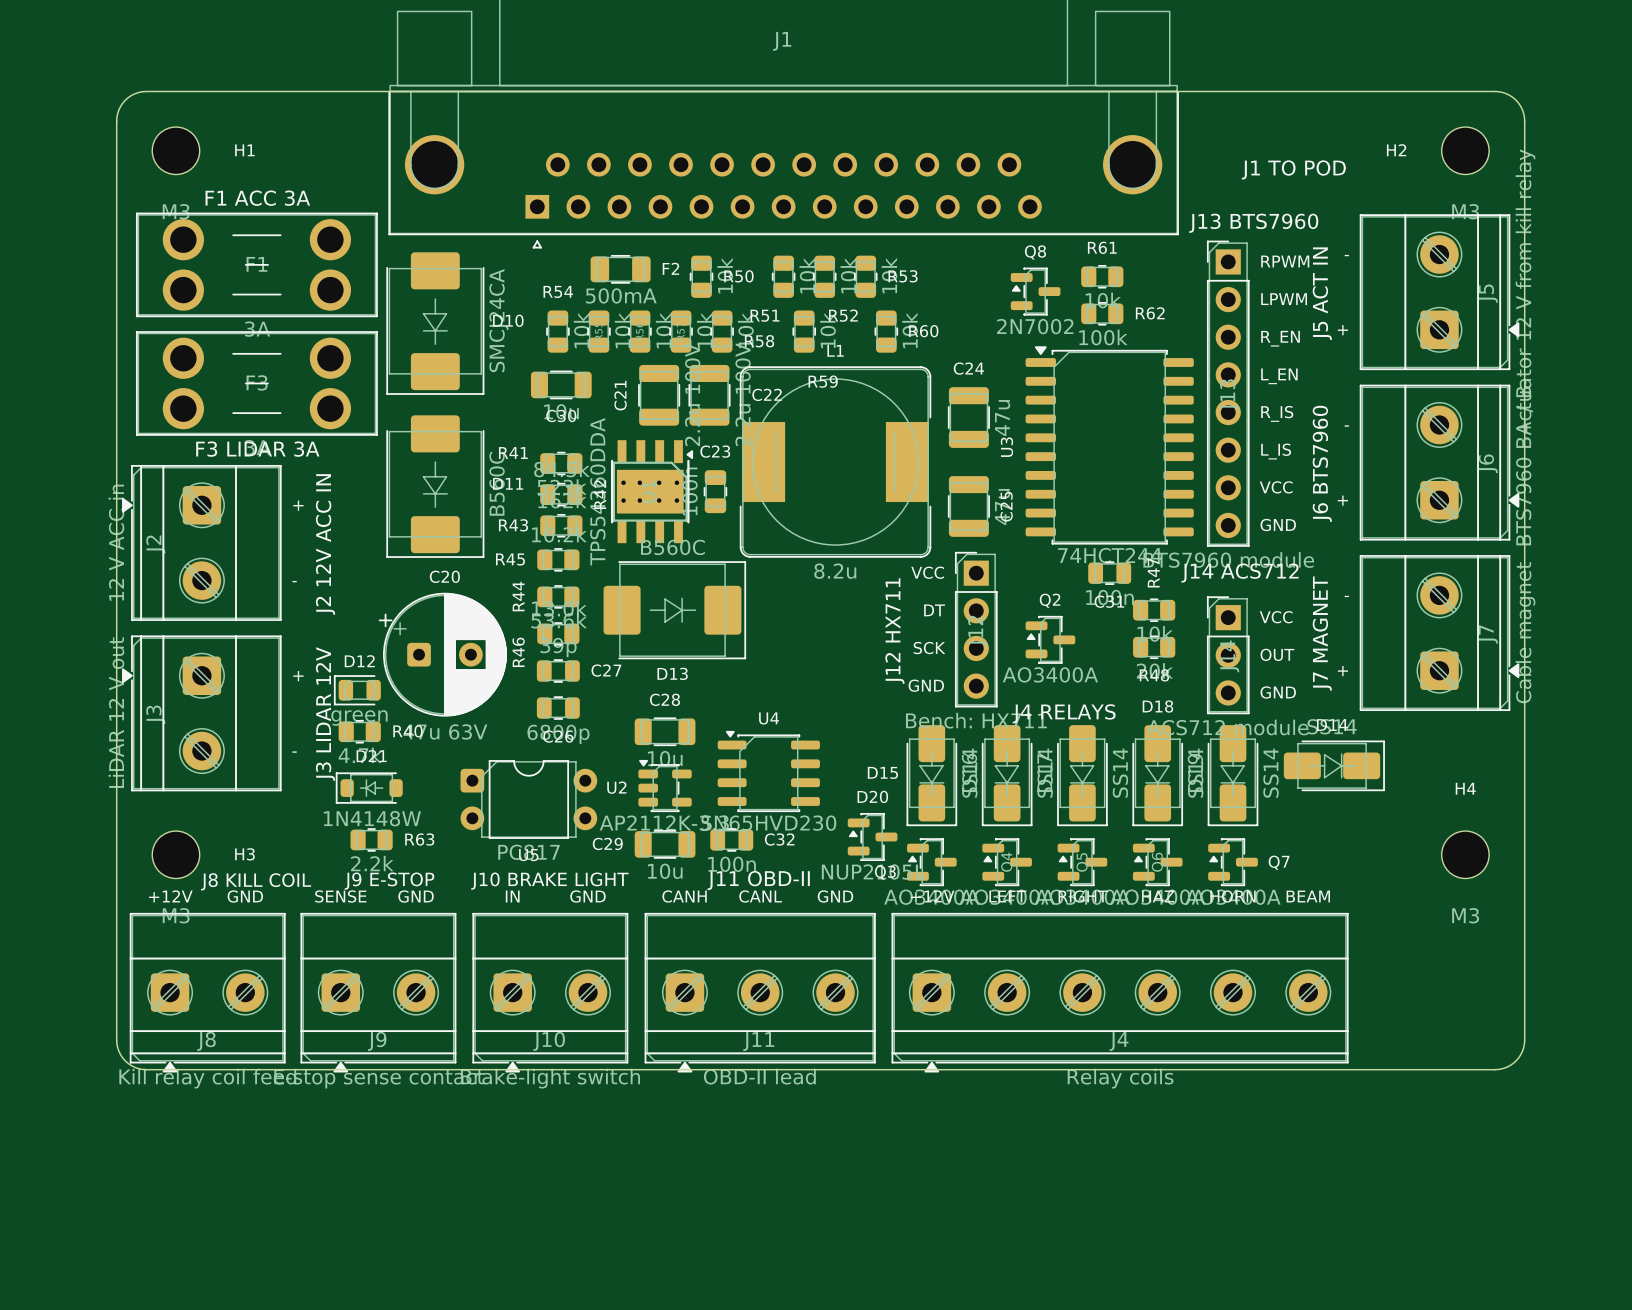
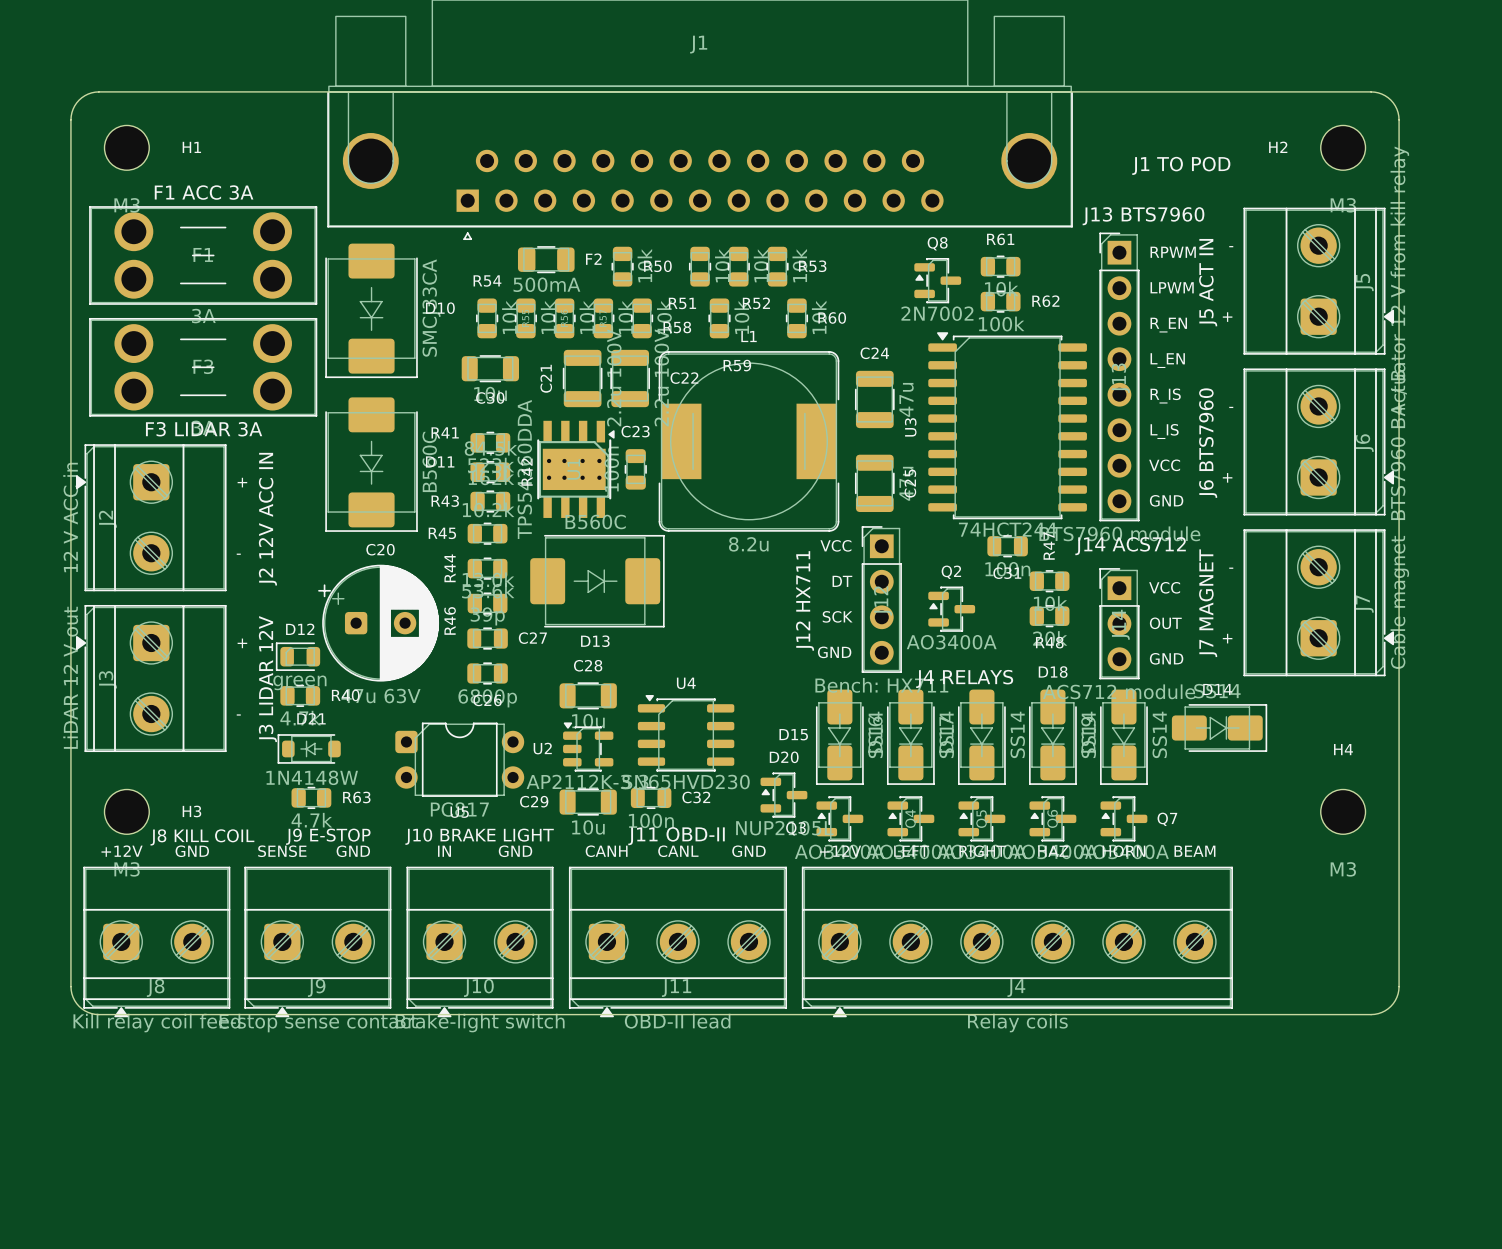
D10 value: SMCJ24CA (498, 320) -> SMCJ33CA (431, 308)
R63 value: 2.2k (372, 863) -> 4.7k (311, 820)

